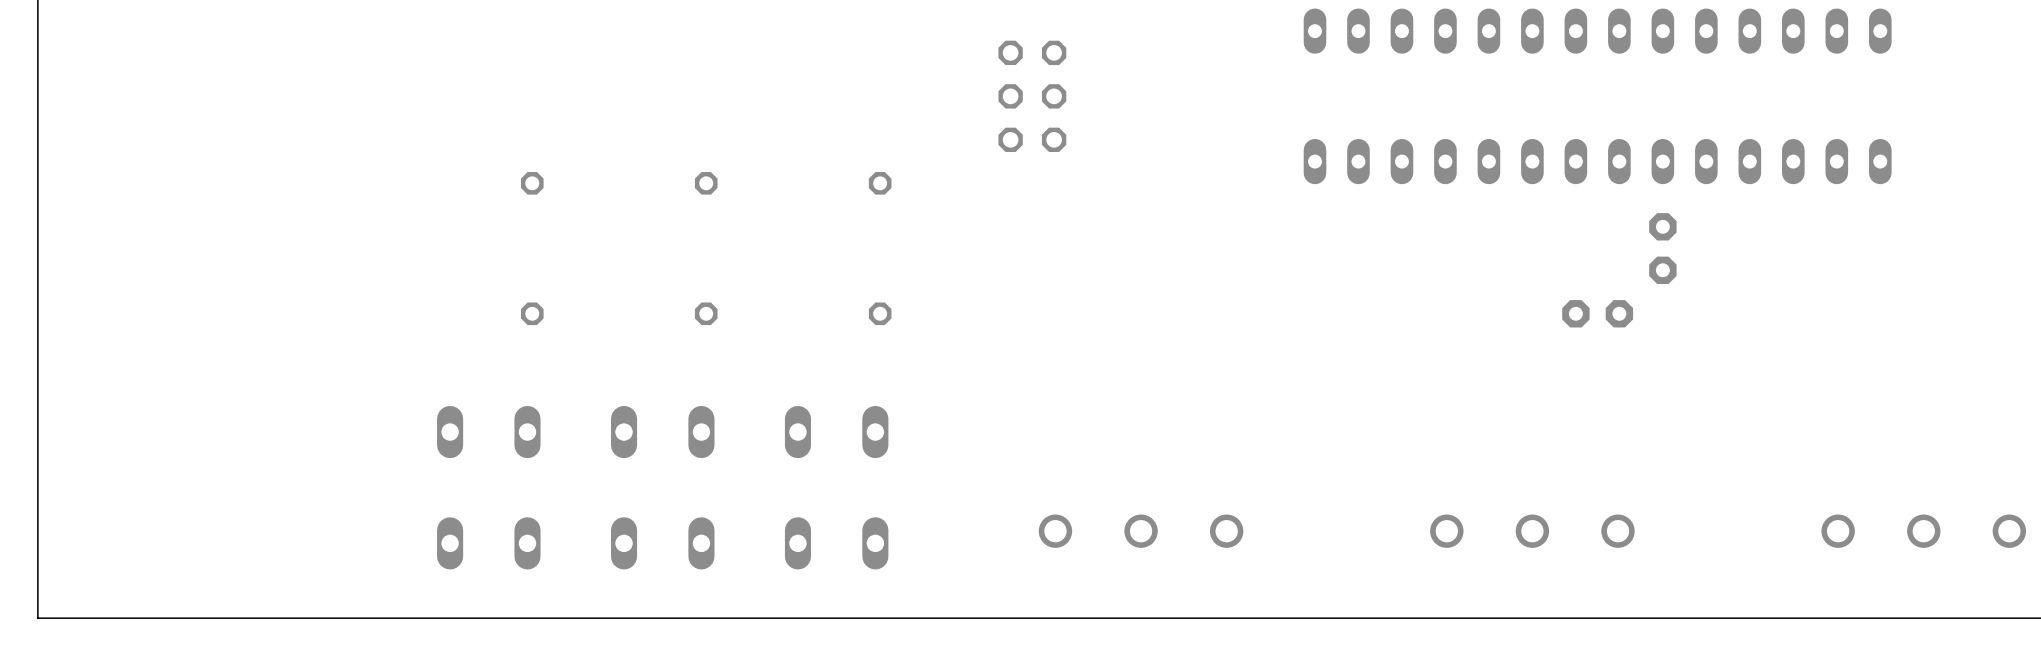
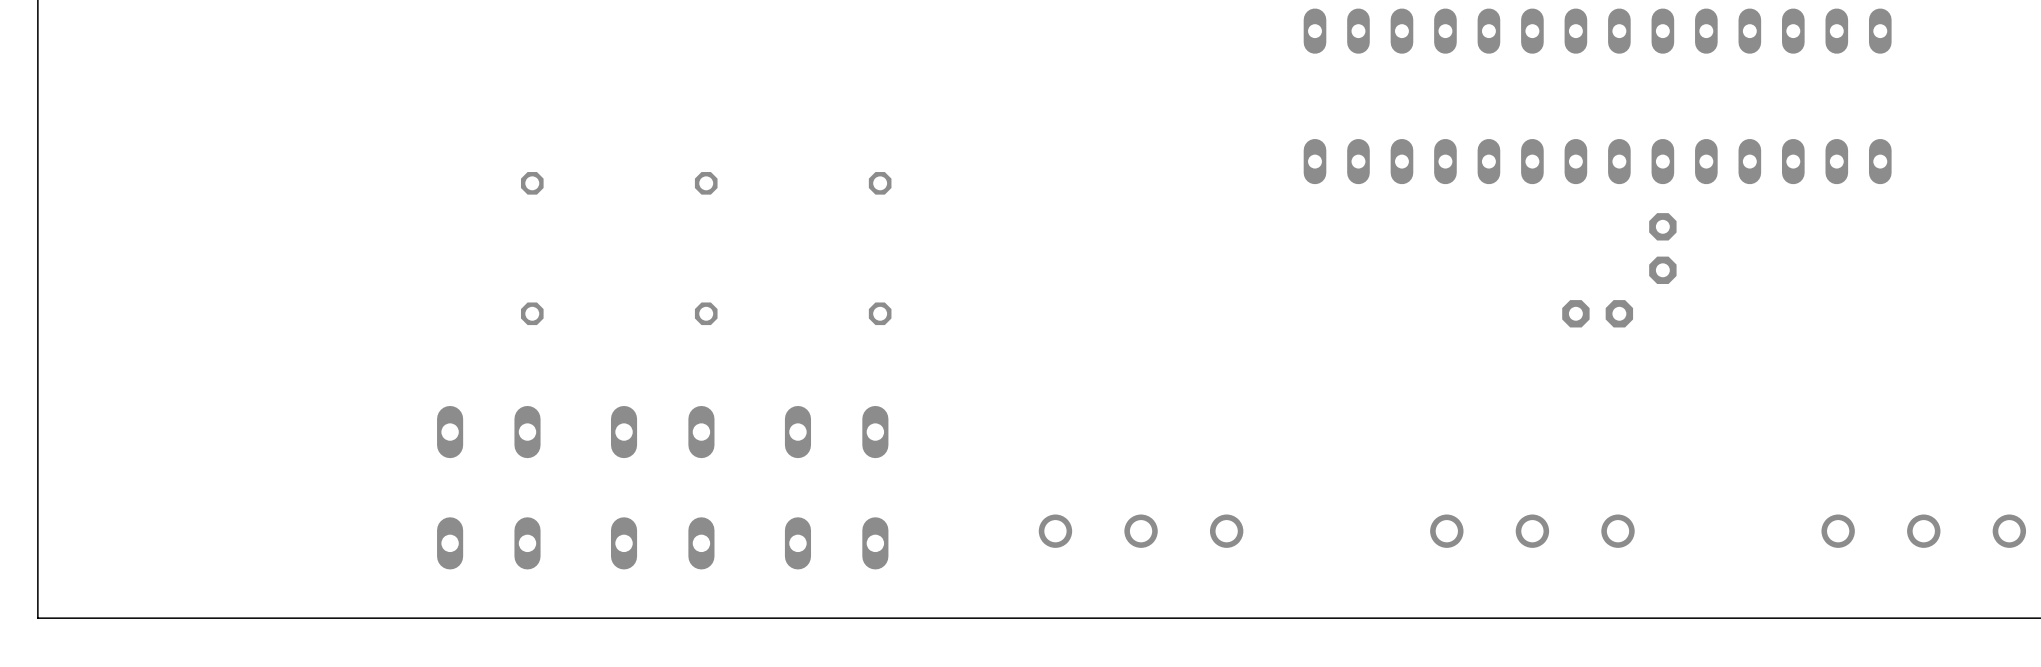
part: (1032, 96) -> none

